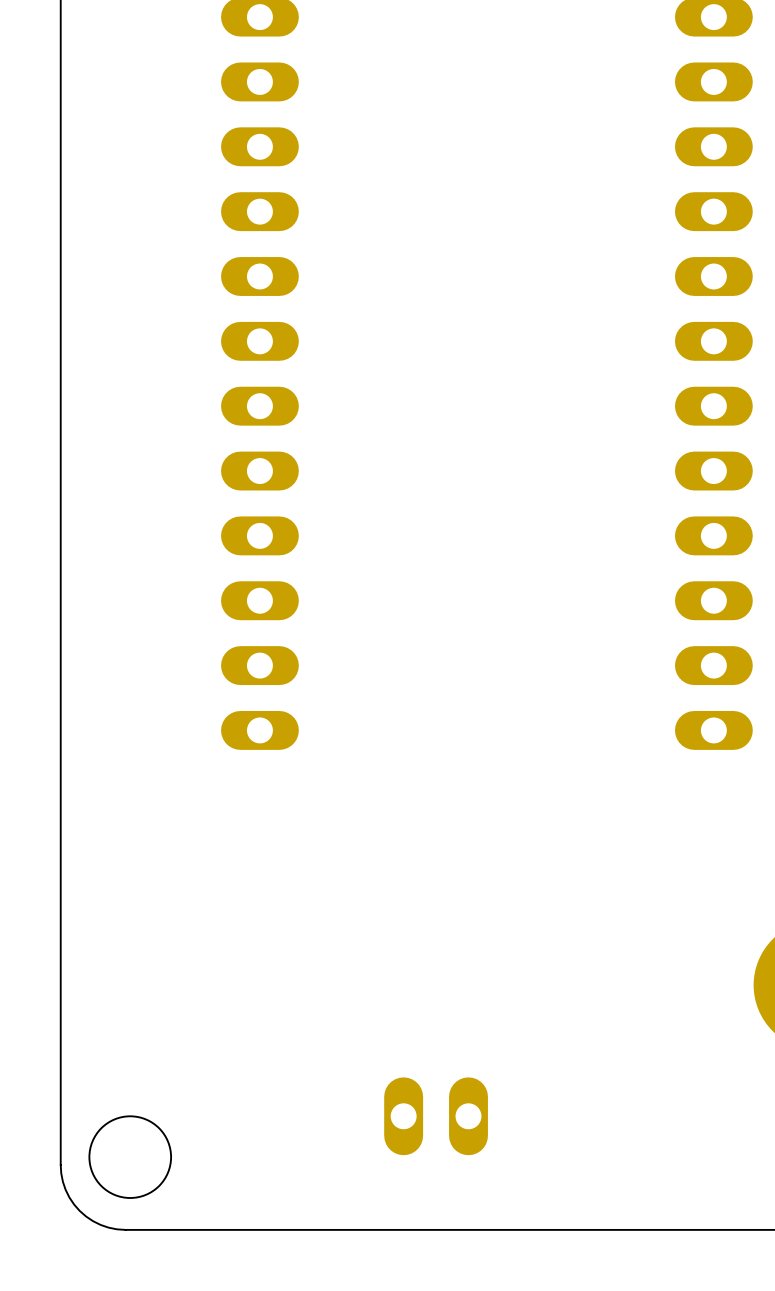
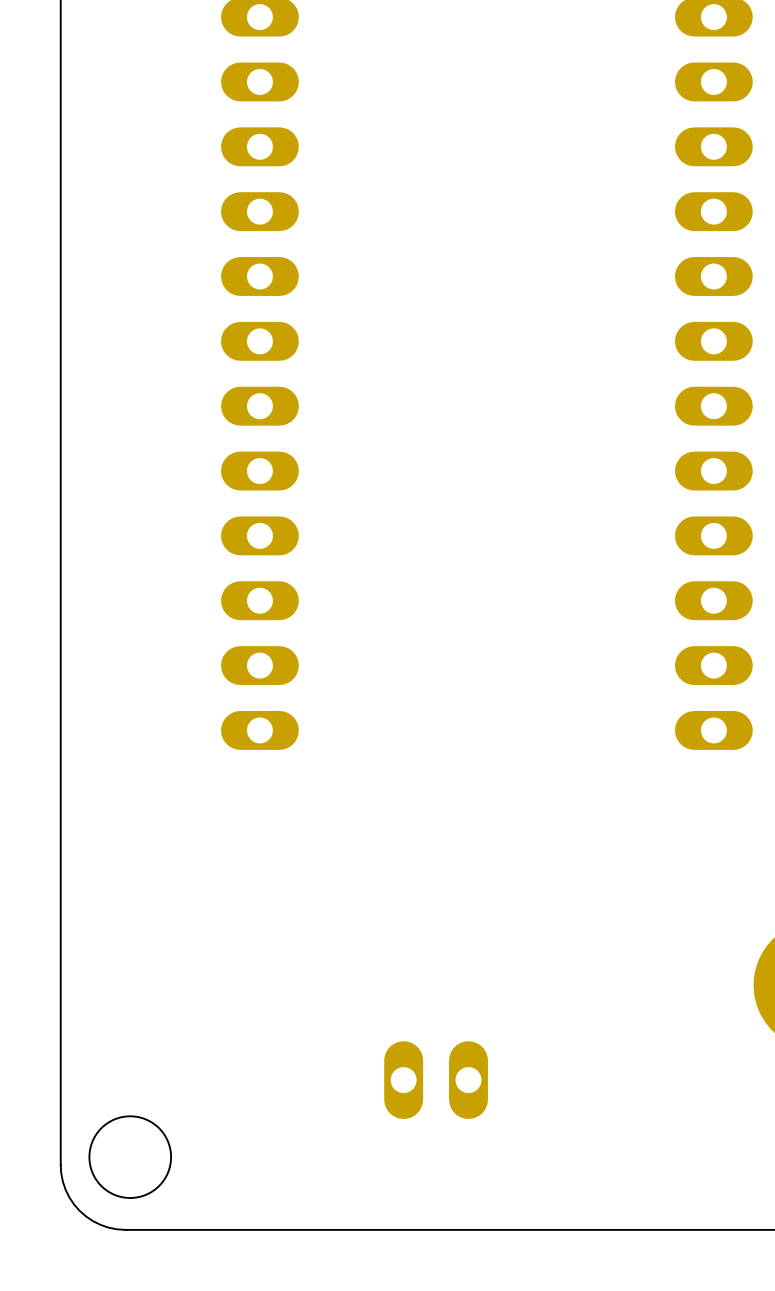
part position: (436, 1116) -> (436, 1080)

